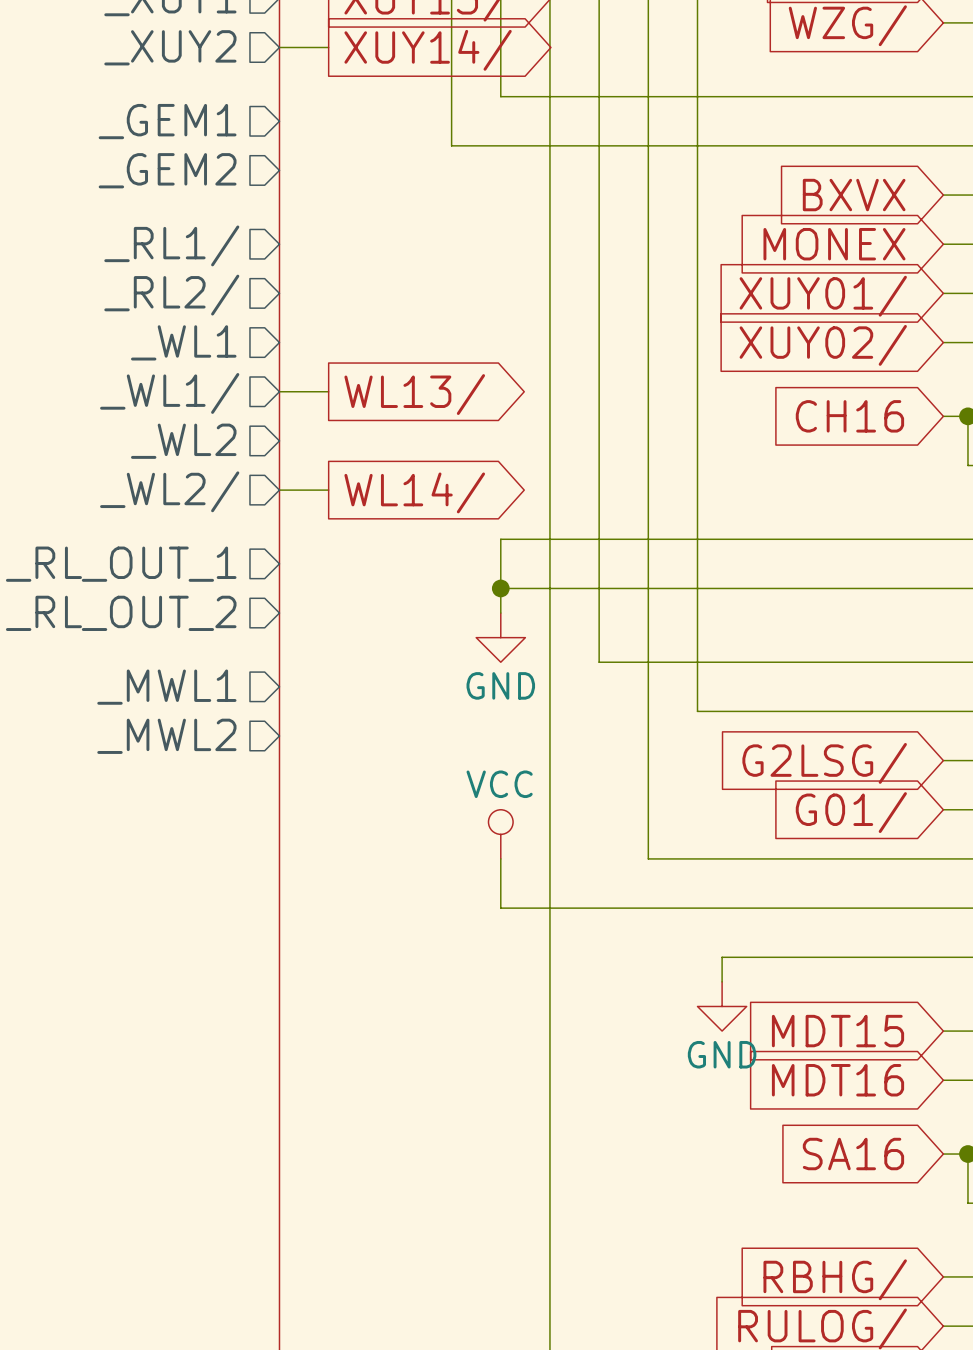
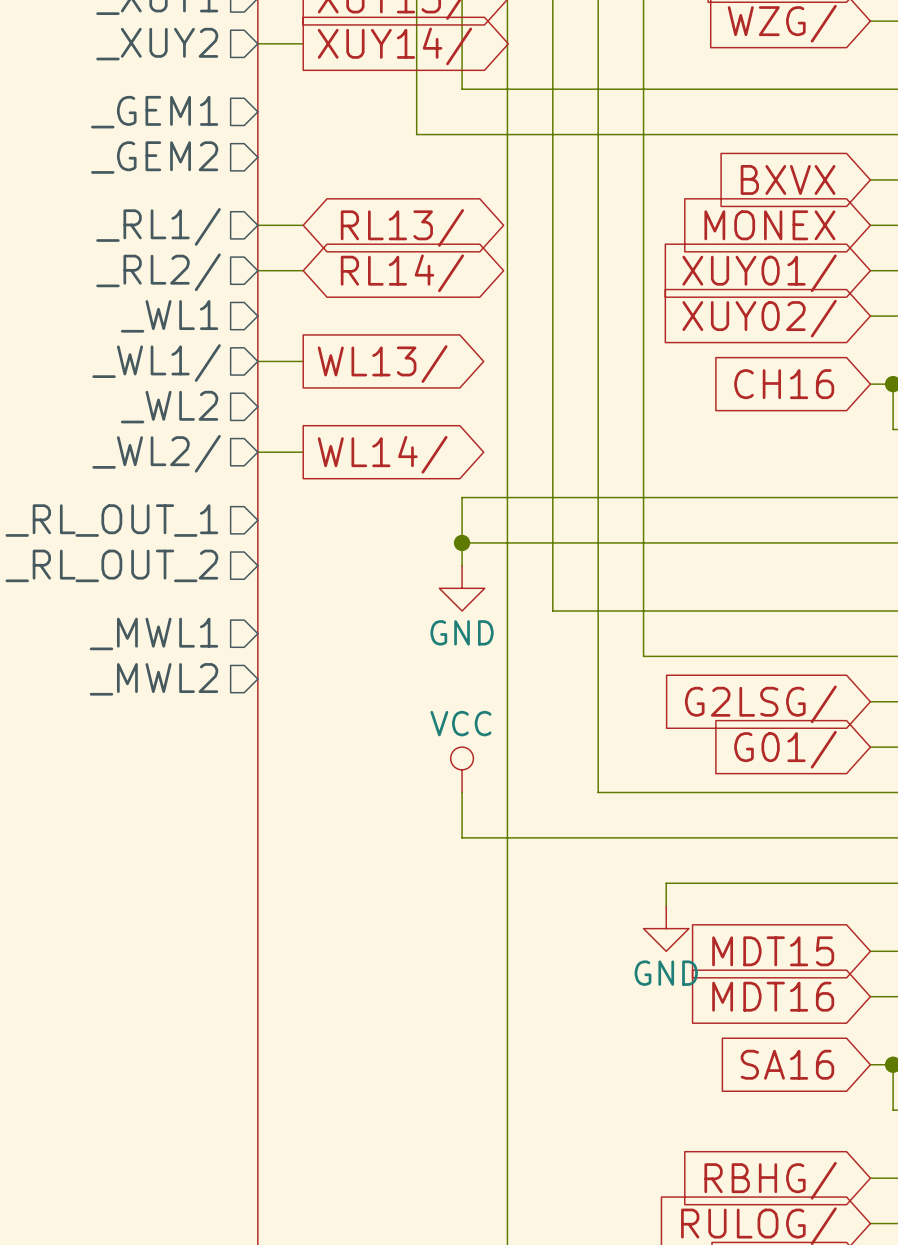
wire: none -> (257, 225) (303, 225)
global label: none -> RL13/ (402, 227)
wire: none -> (257, 270) (303, 270)
global label: none -> RL14/ (402, 273)

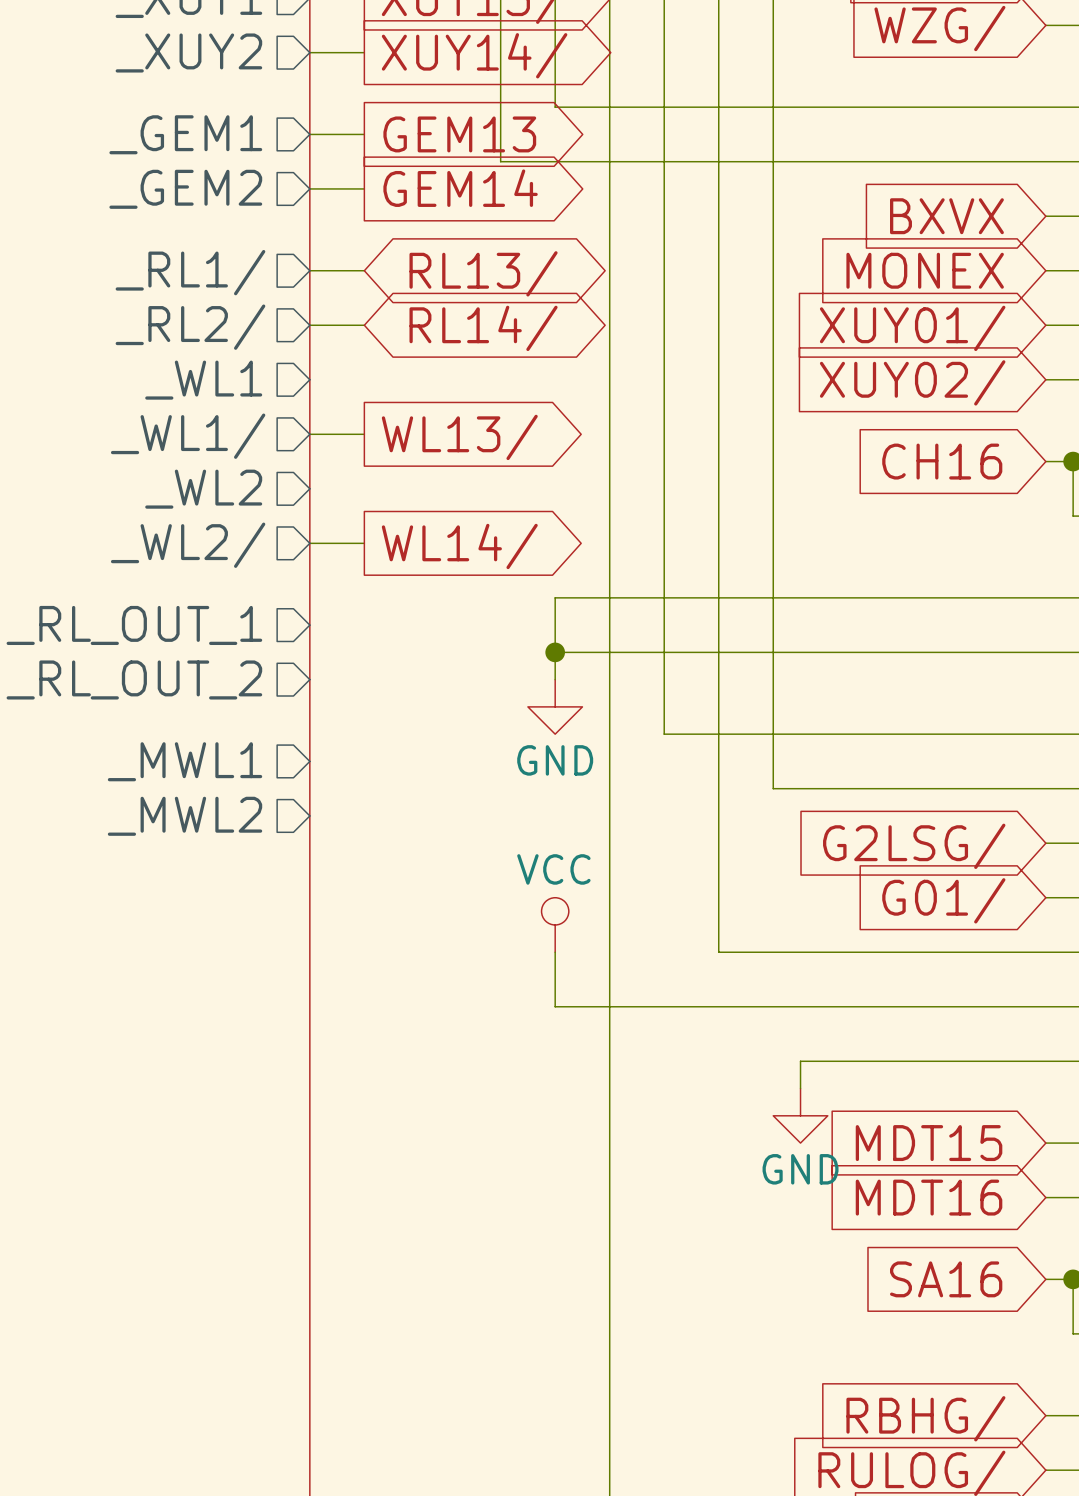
wire: none -> (309, 134) (364, 134)
global label: none -> GEM13 (459, 134)
global label: none -> GEM14 (460, 188)
wire: none -> (309, 188) (364, 188)

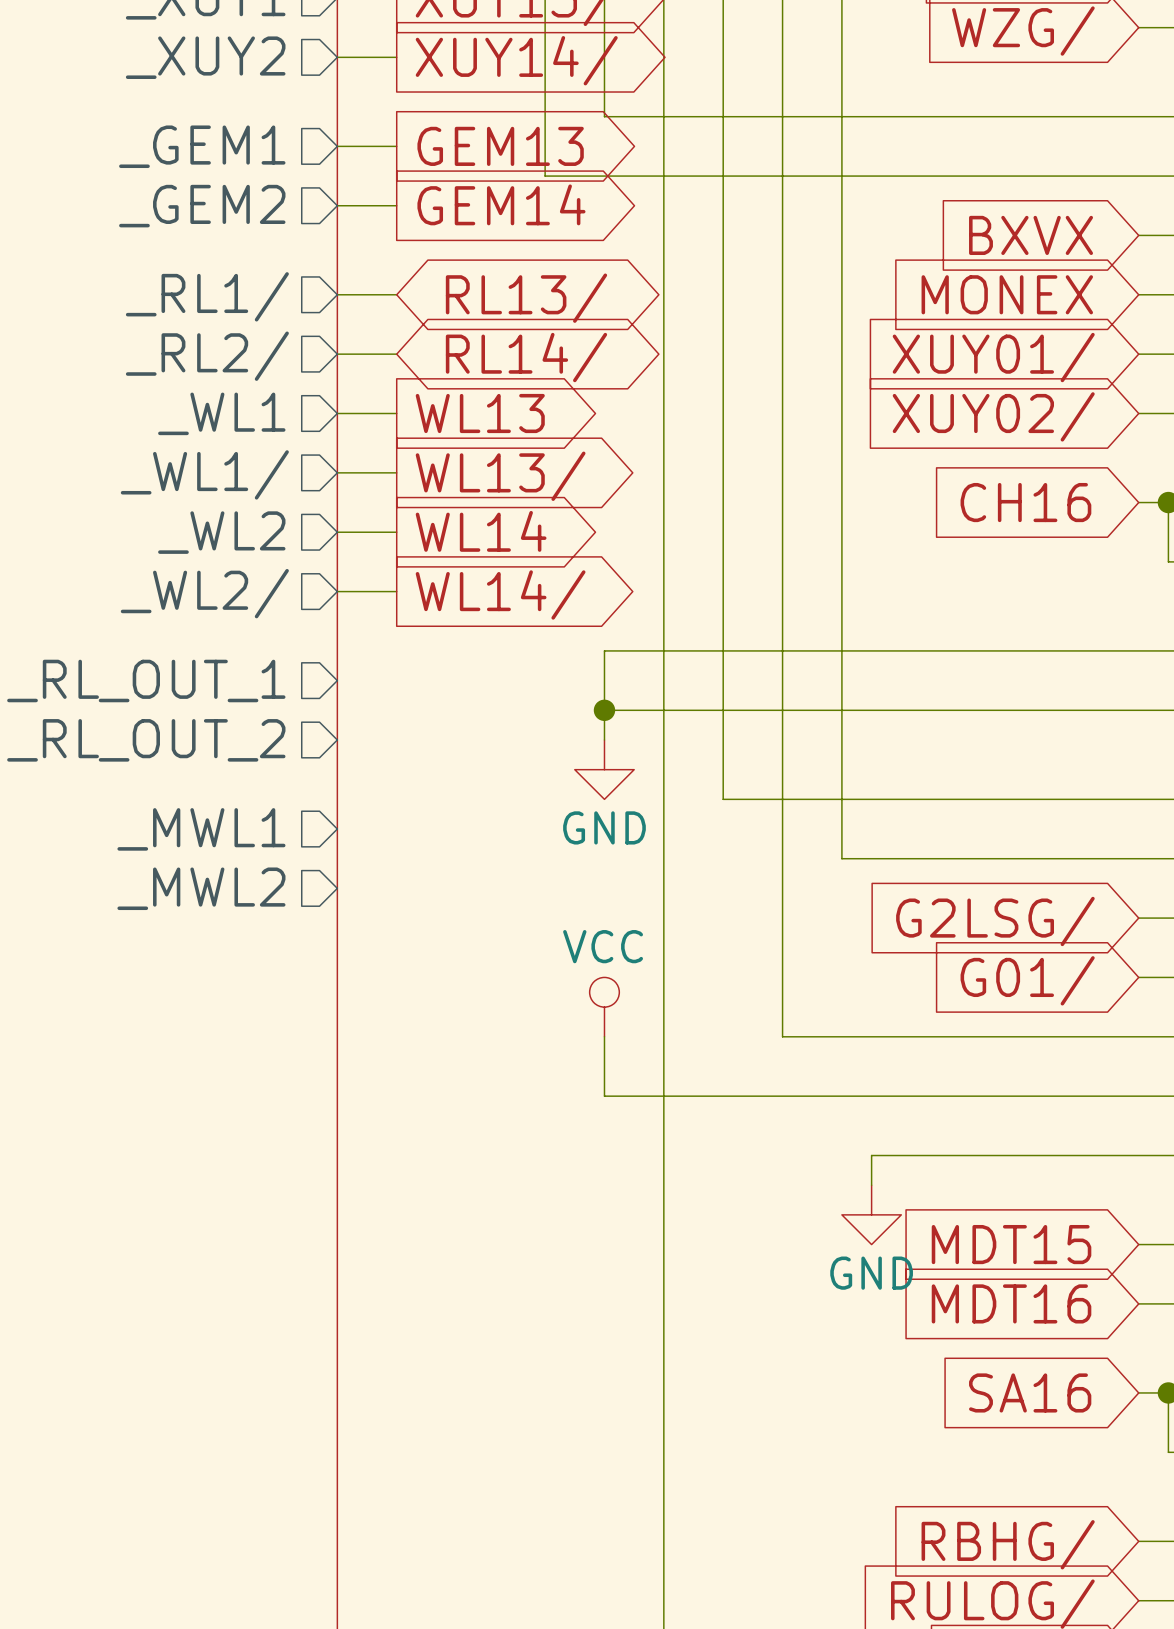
wire: none -> (337, 413) (396, 413)
global label: none -> WL13 (480, 413)
wire: none -> (337, 532) (396, 532)
global label: none -> WL14 (481, 531)

